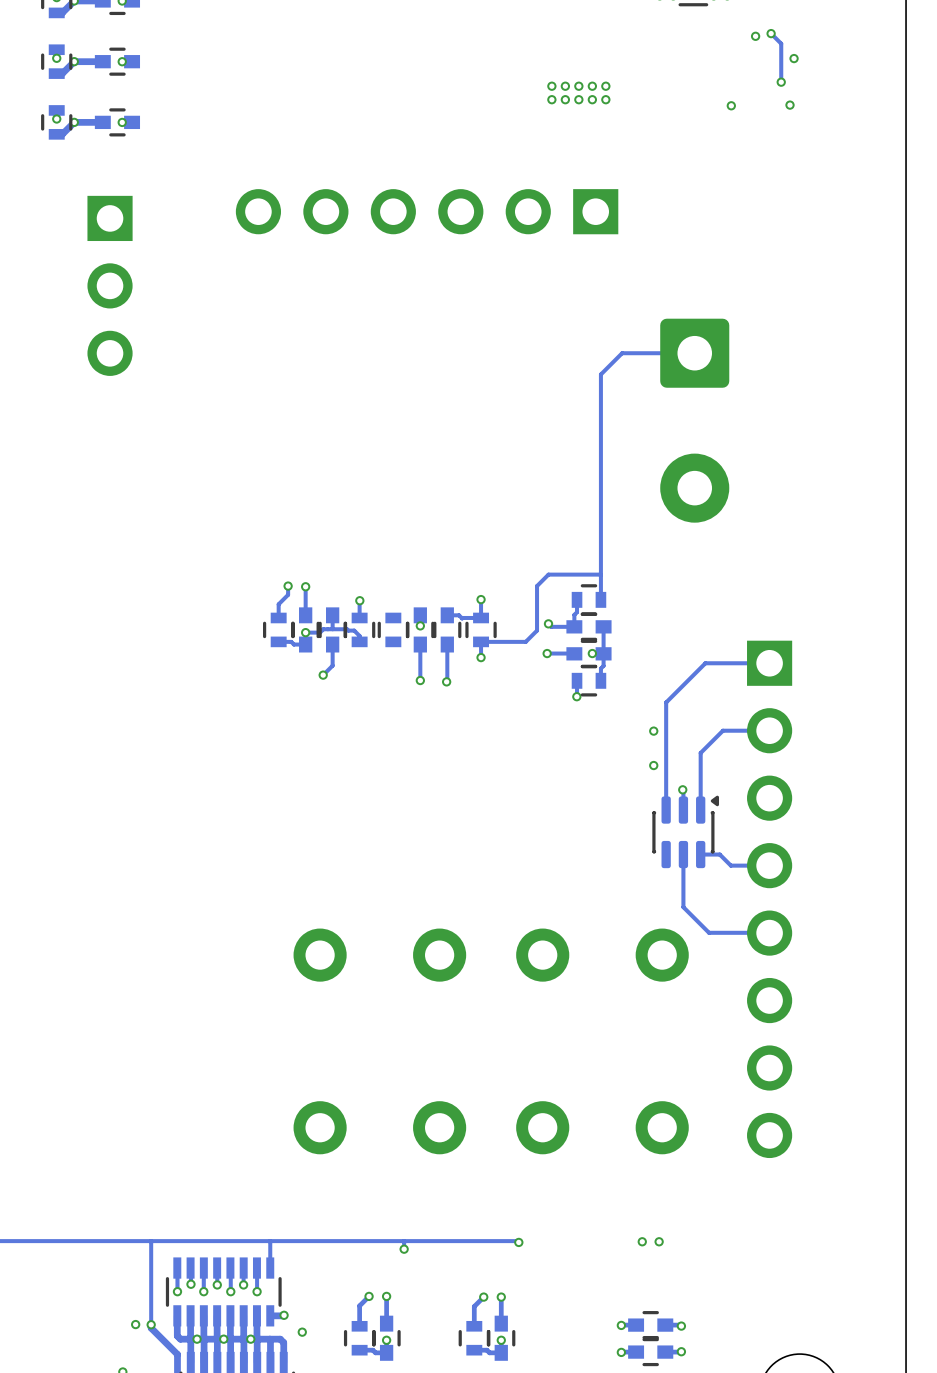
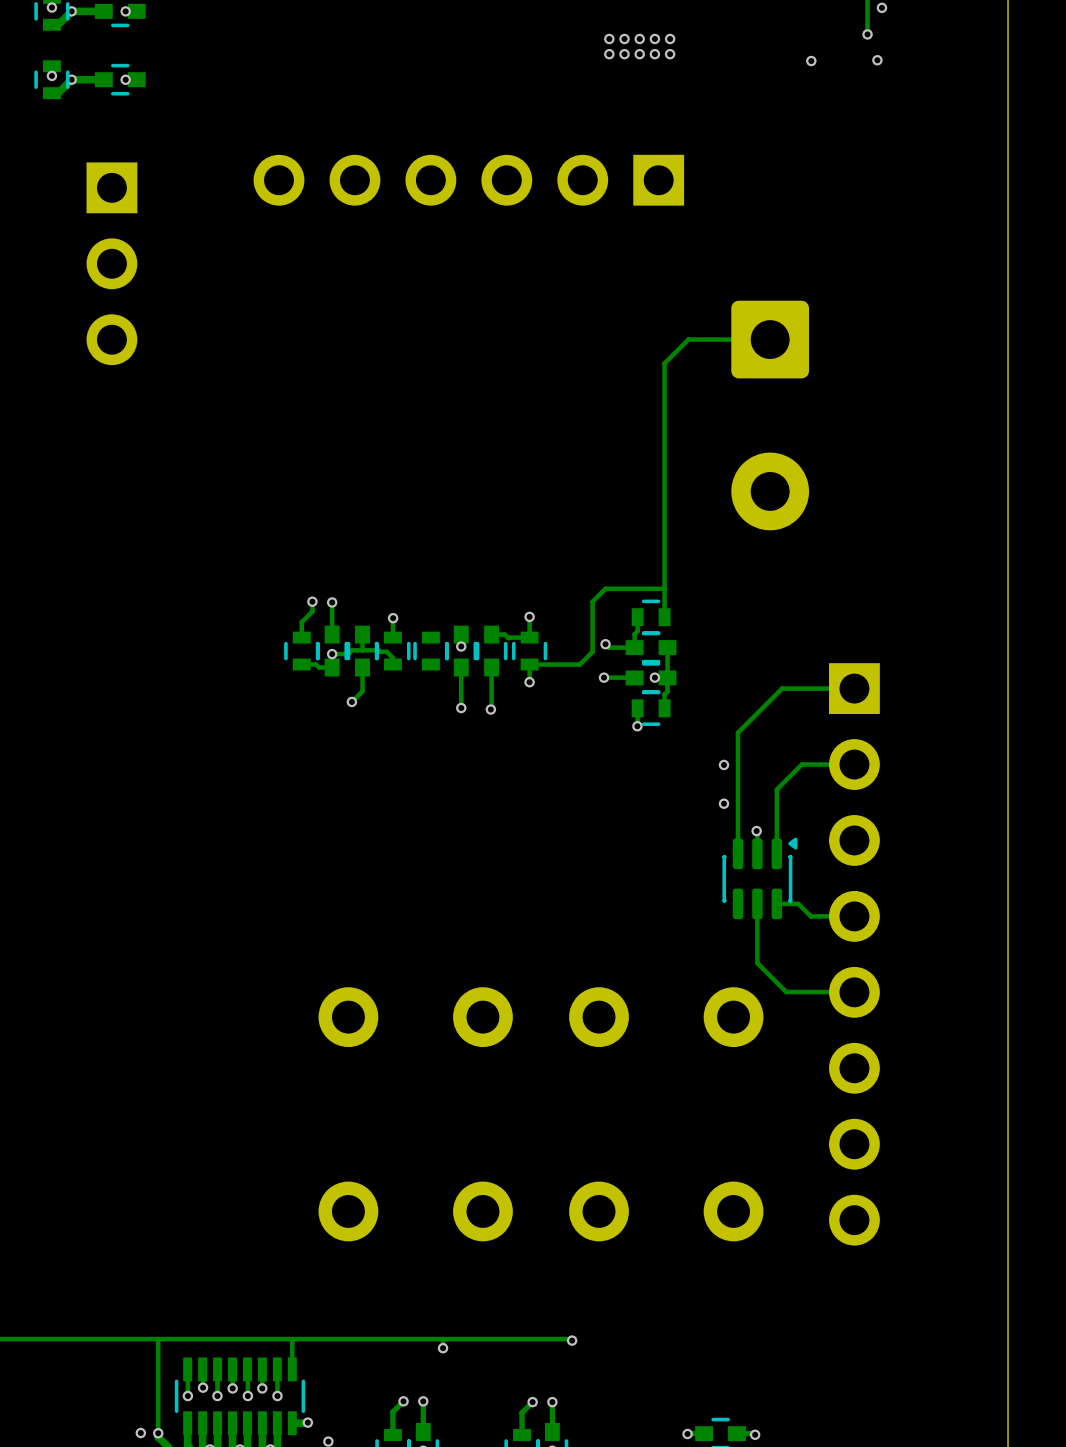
via: (642, 1241) -> none
via: (659, 1241) -> none

